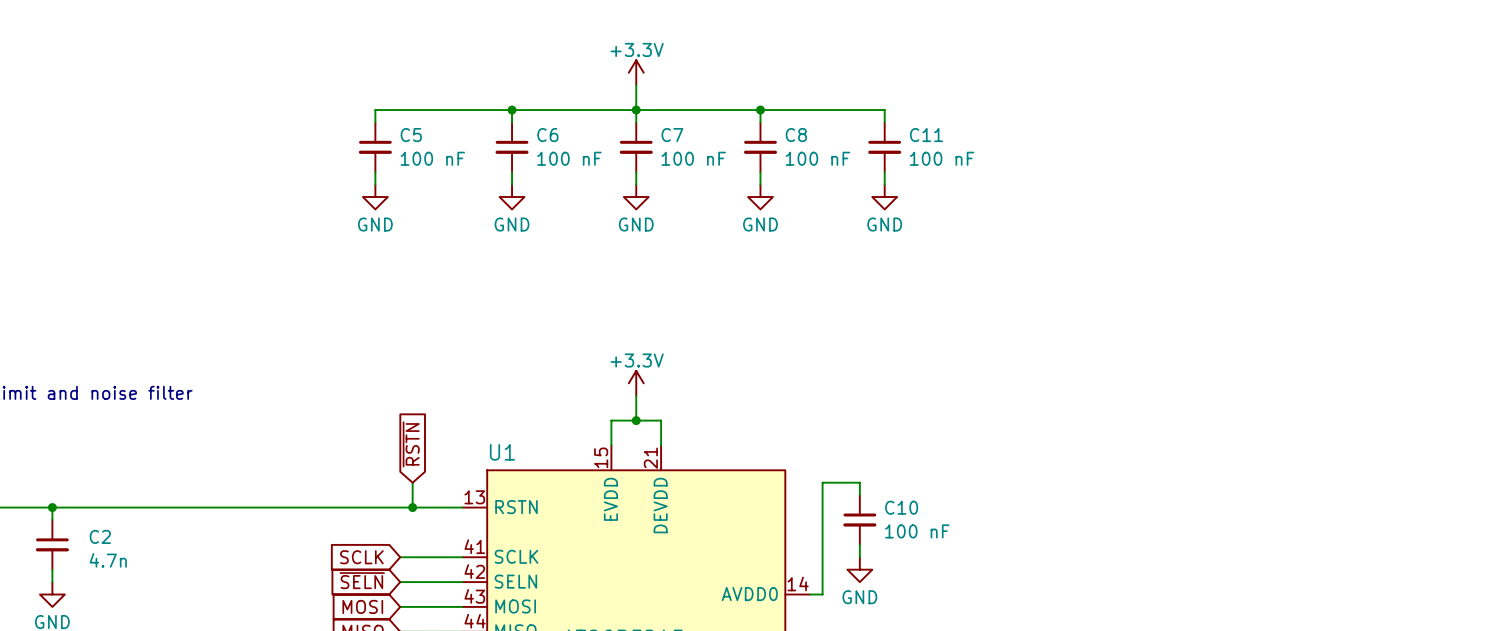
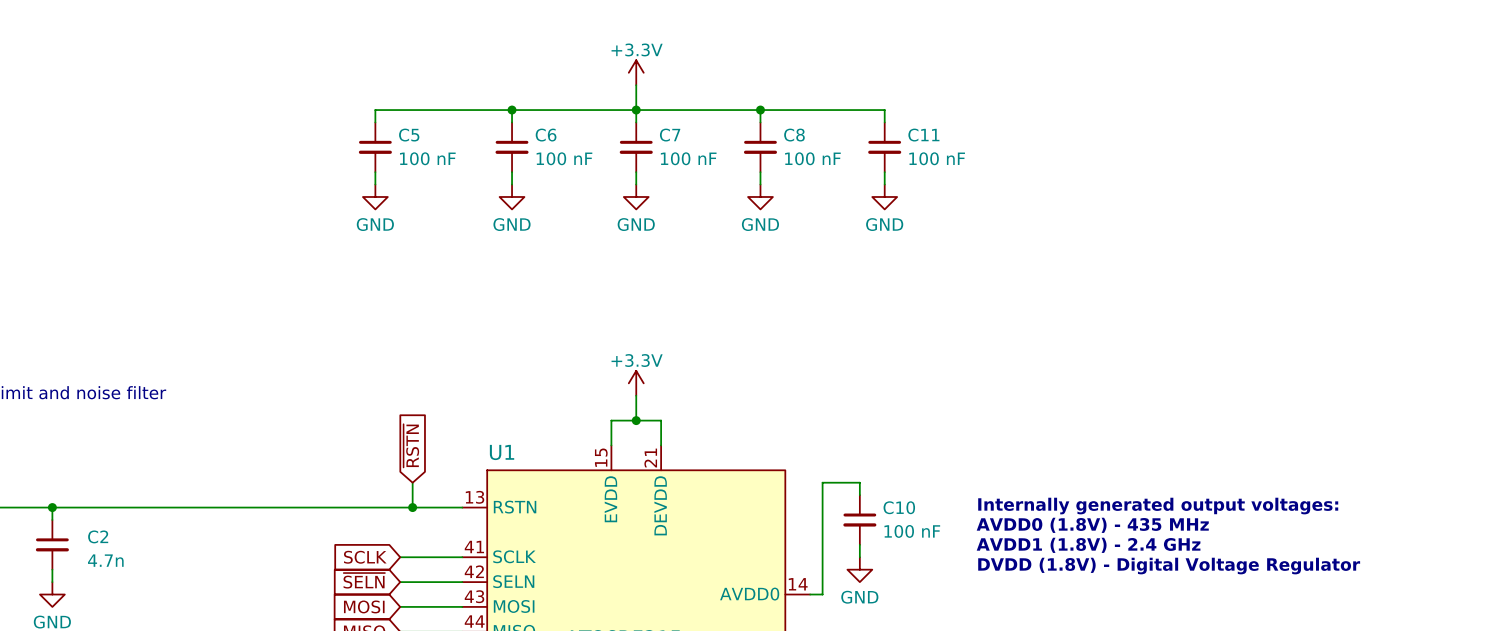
text: none -> Internally generated output voltages: (1158, 506)
text: none -> AVDD0 (1.8V) - 435 MHz (1092, 525)
text: none -> AVDD1 (1.8V) - 2.4 GHz (1088, 545)
text: none -> DVDD (1.8V) - Digital Voltage Regulator (1169, 566)

